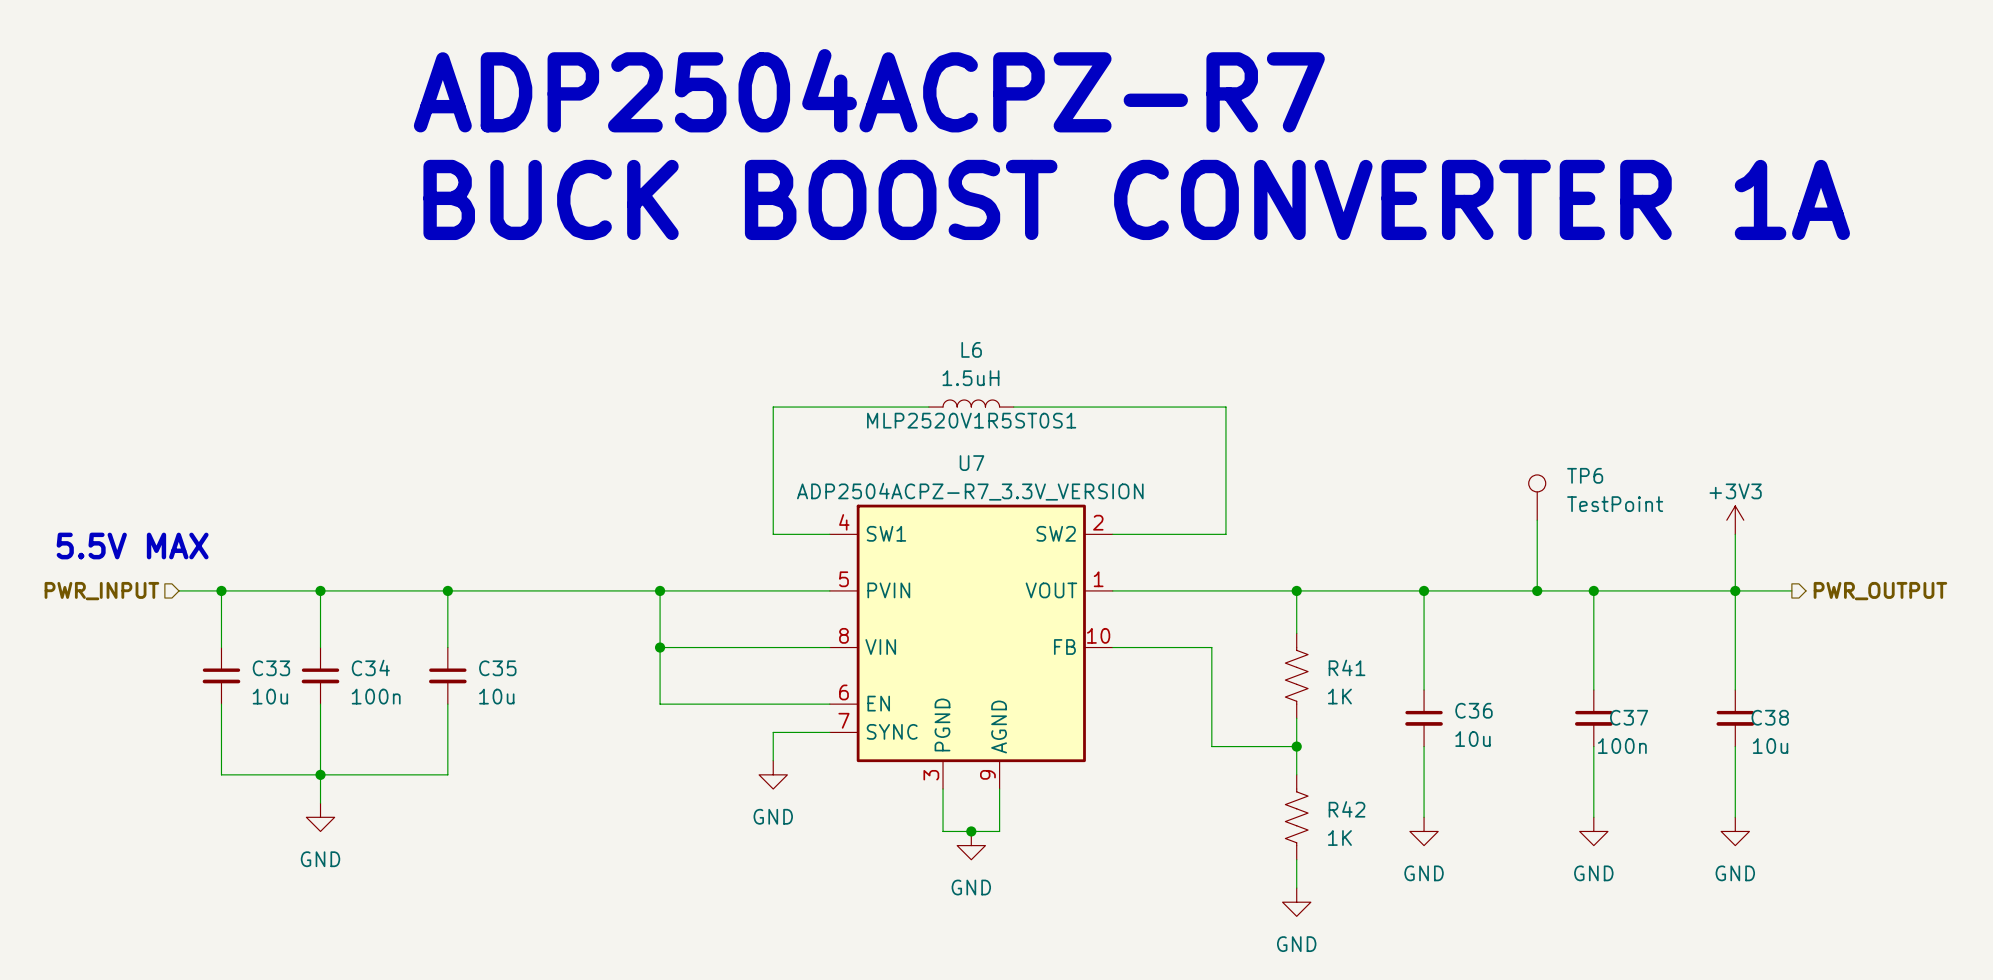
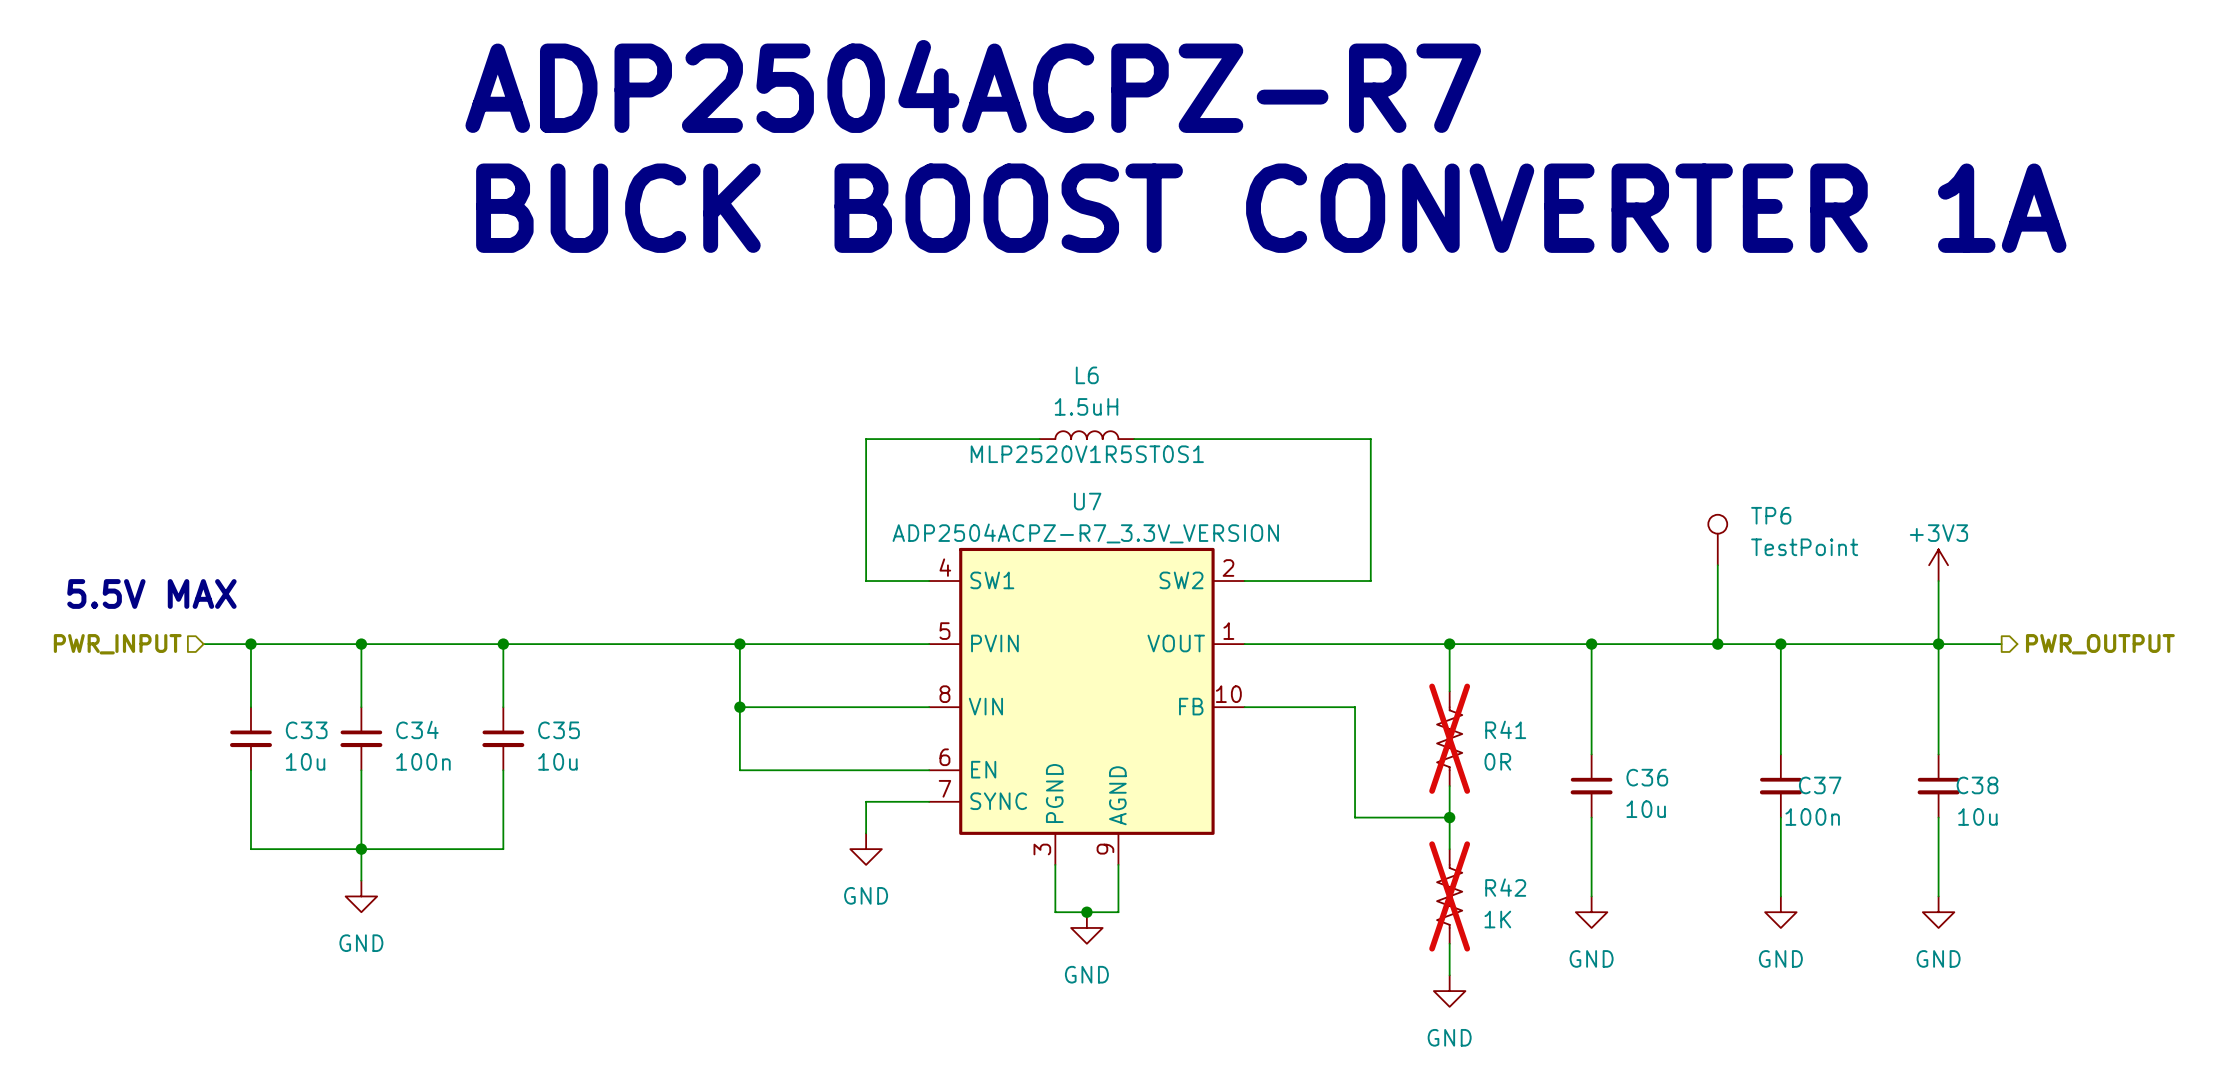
R41 do-not-place cross: none -> (1449, 738)
R41 value: 1K (1339, 696) -> 0R (1497, 761)
R42 do-not-place cross: none -> (1449, 896)

